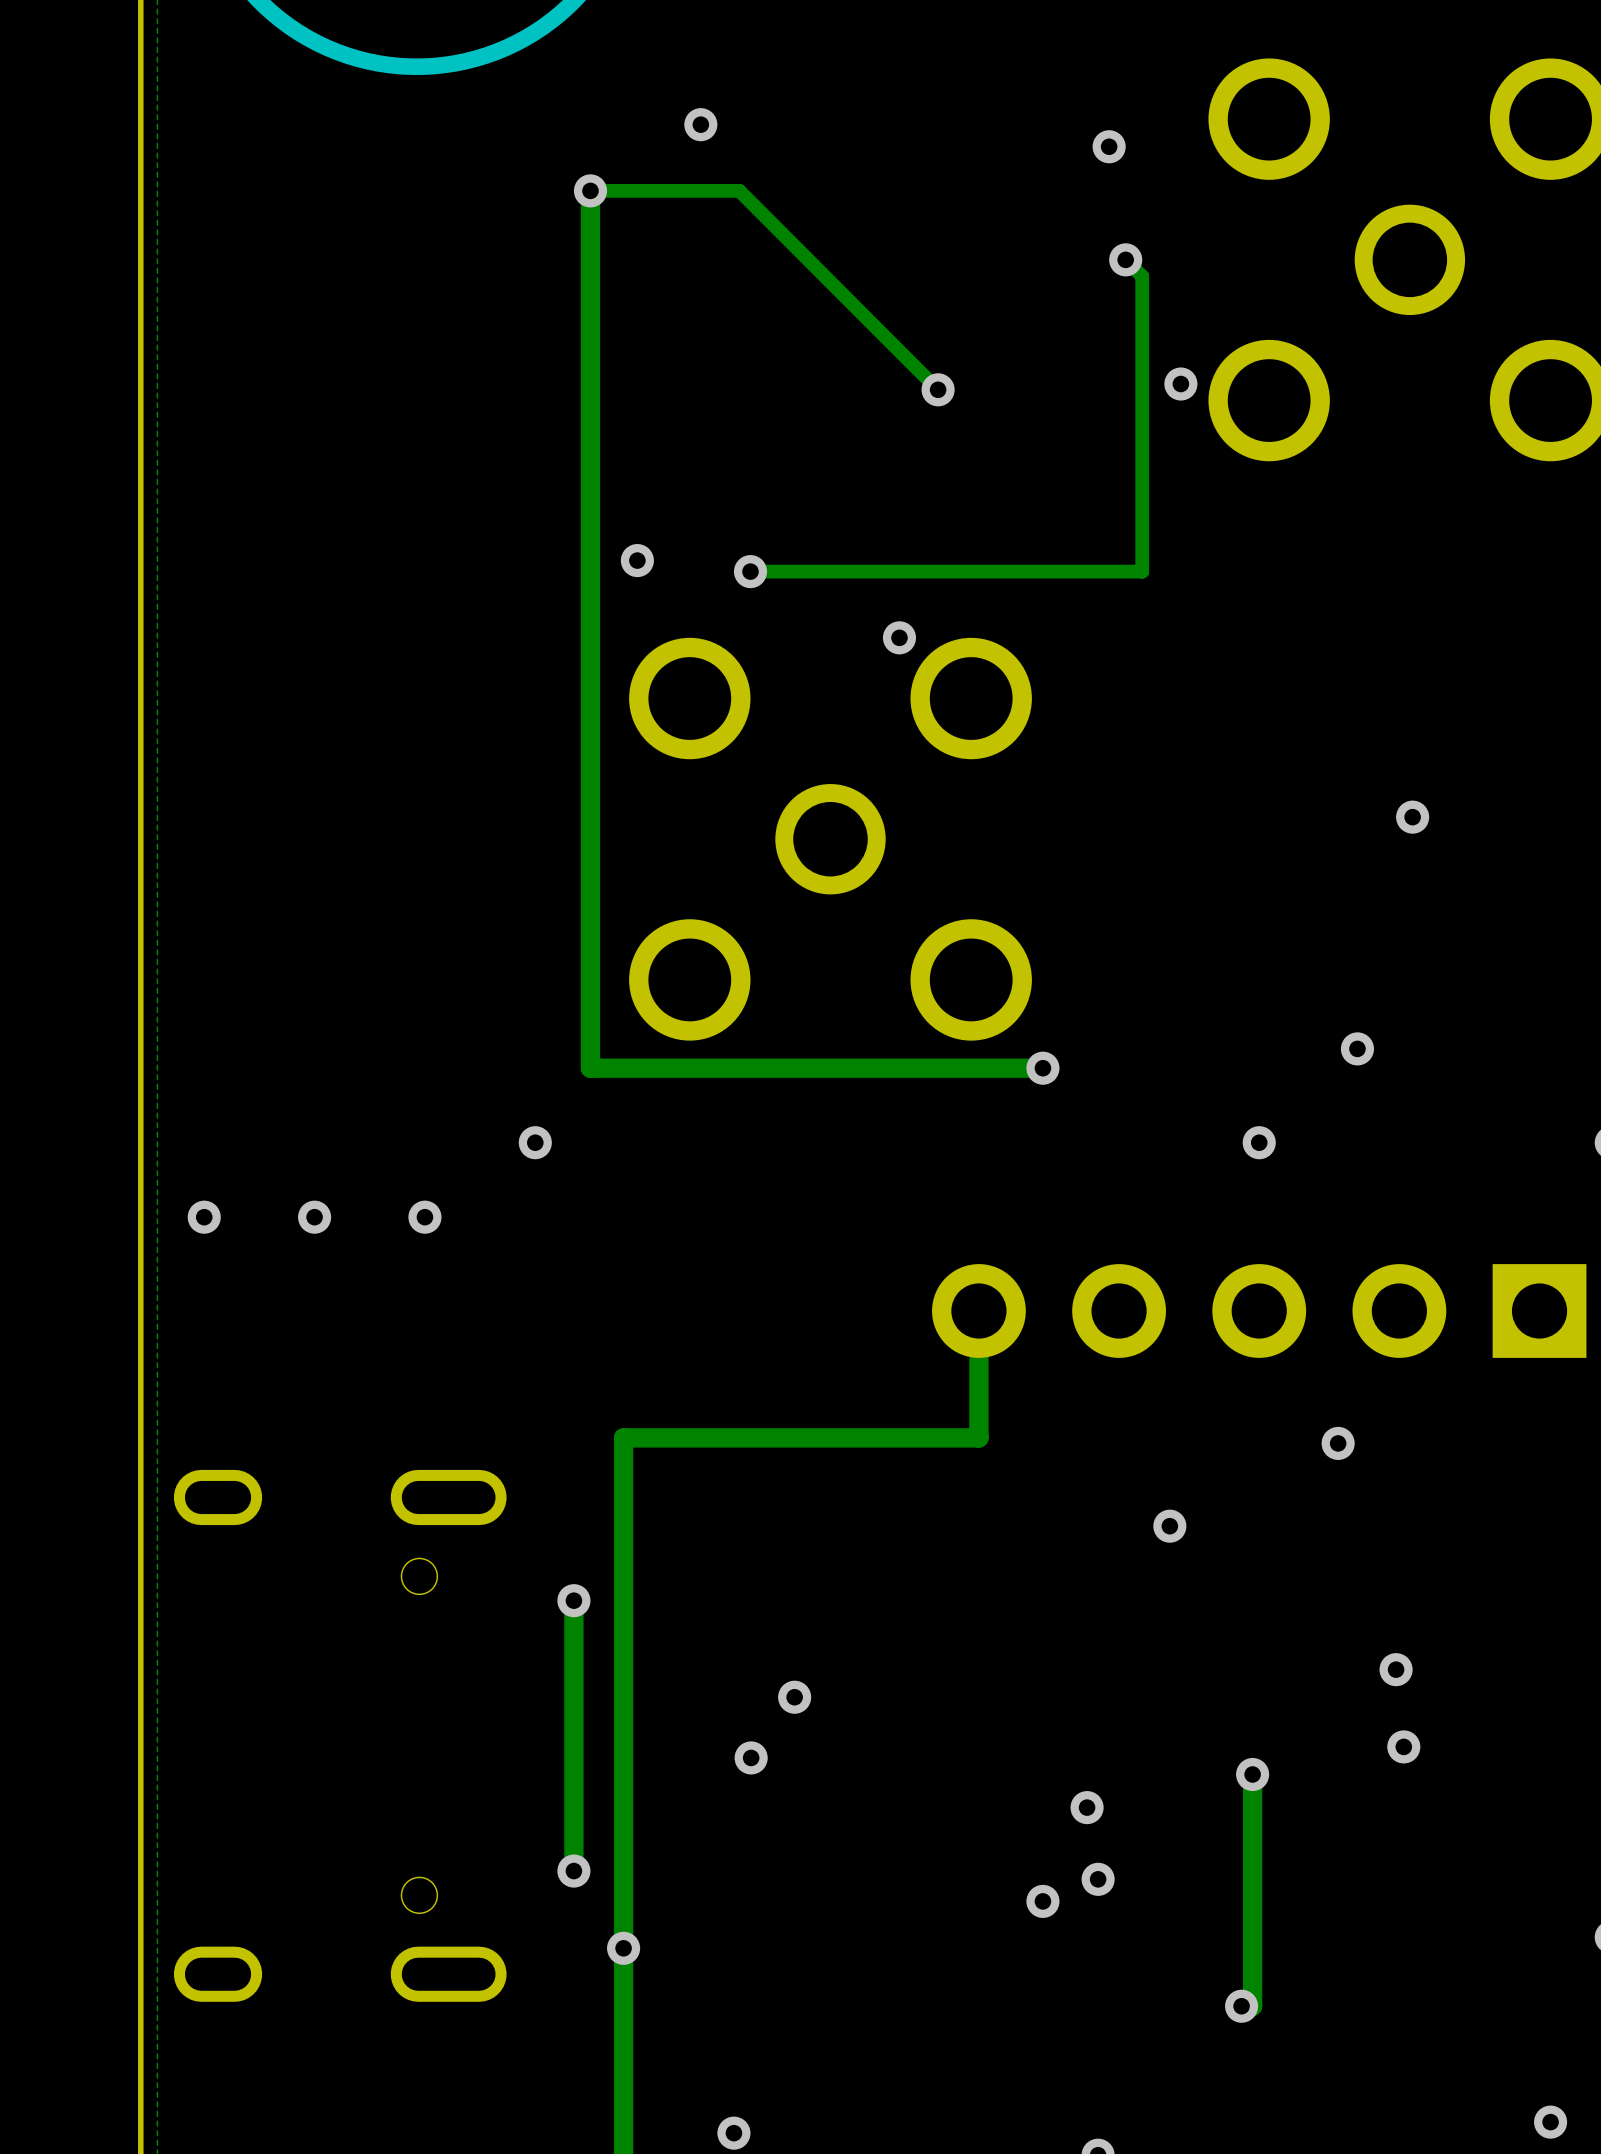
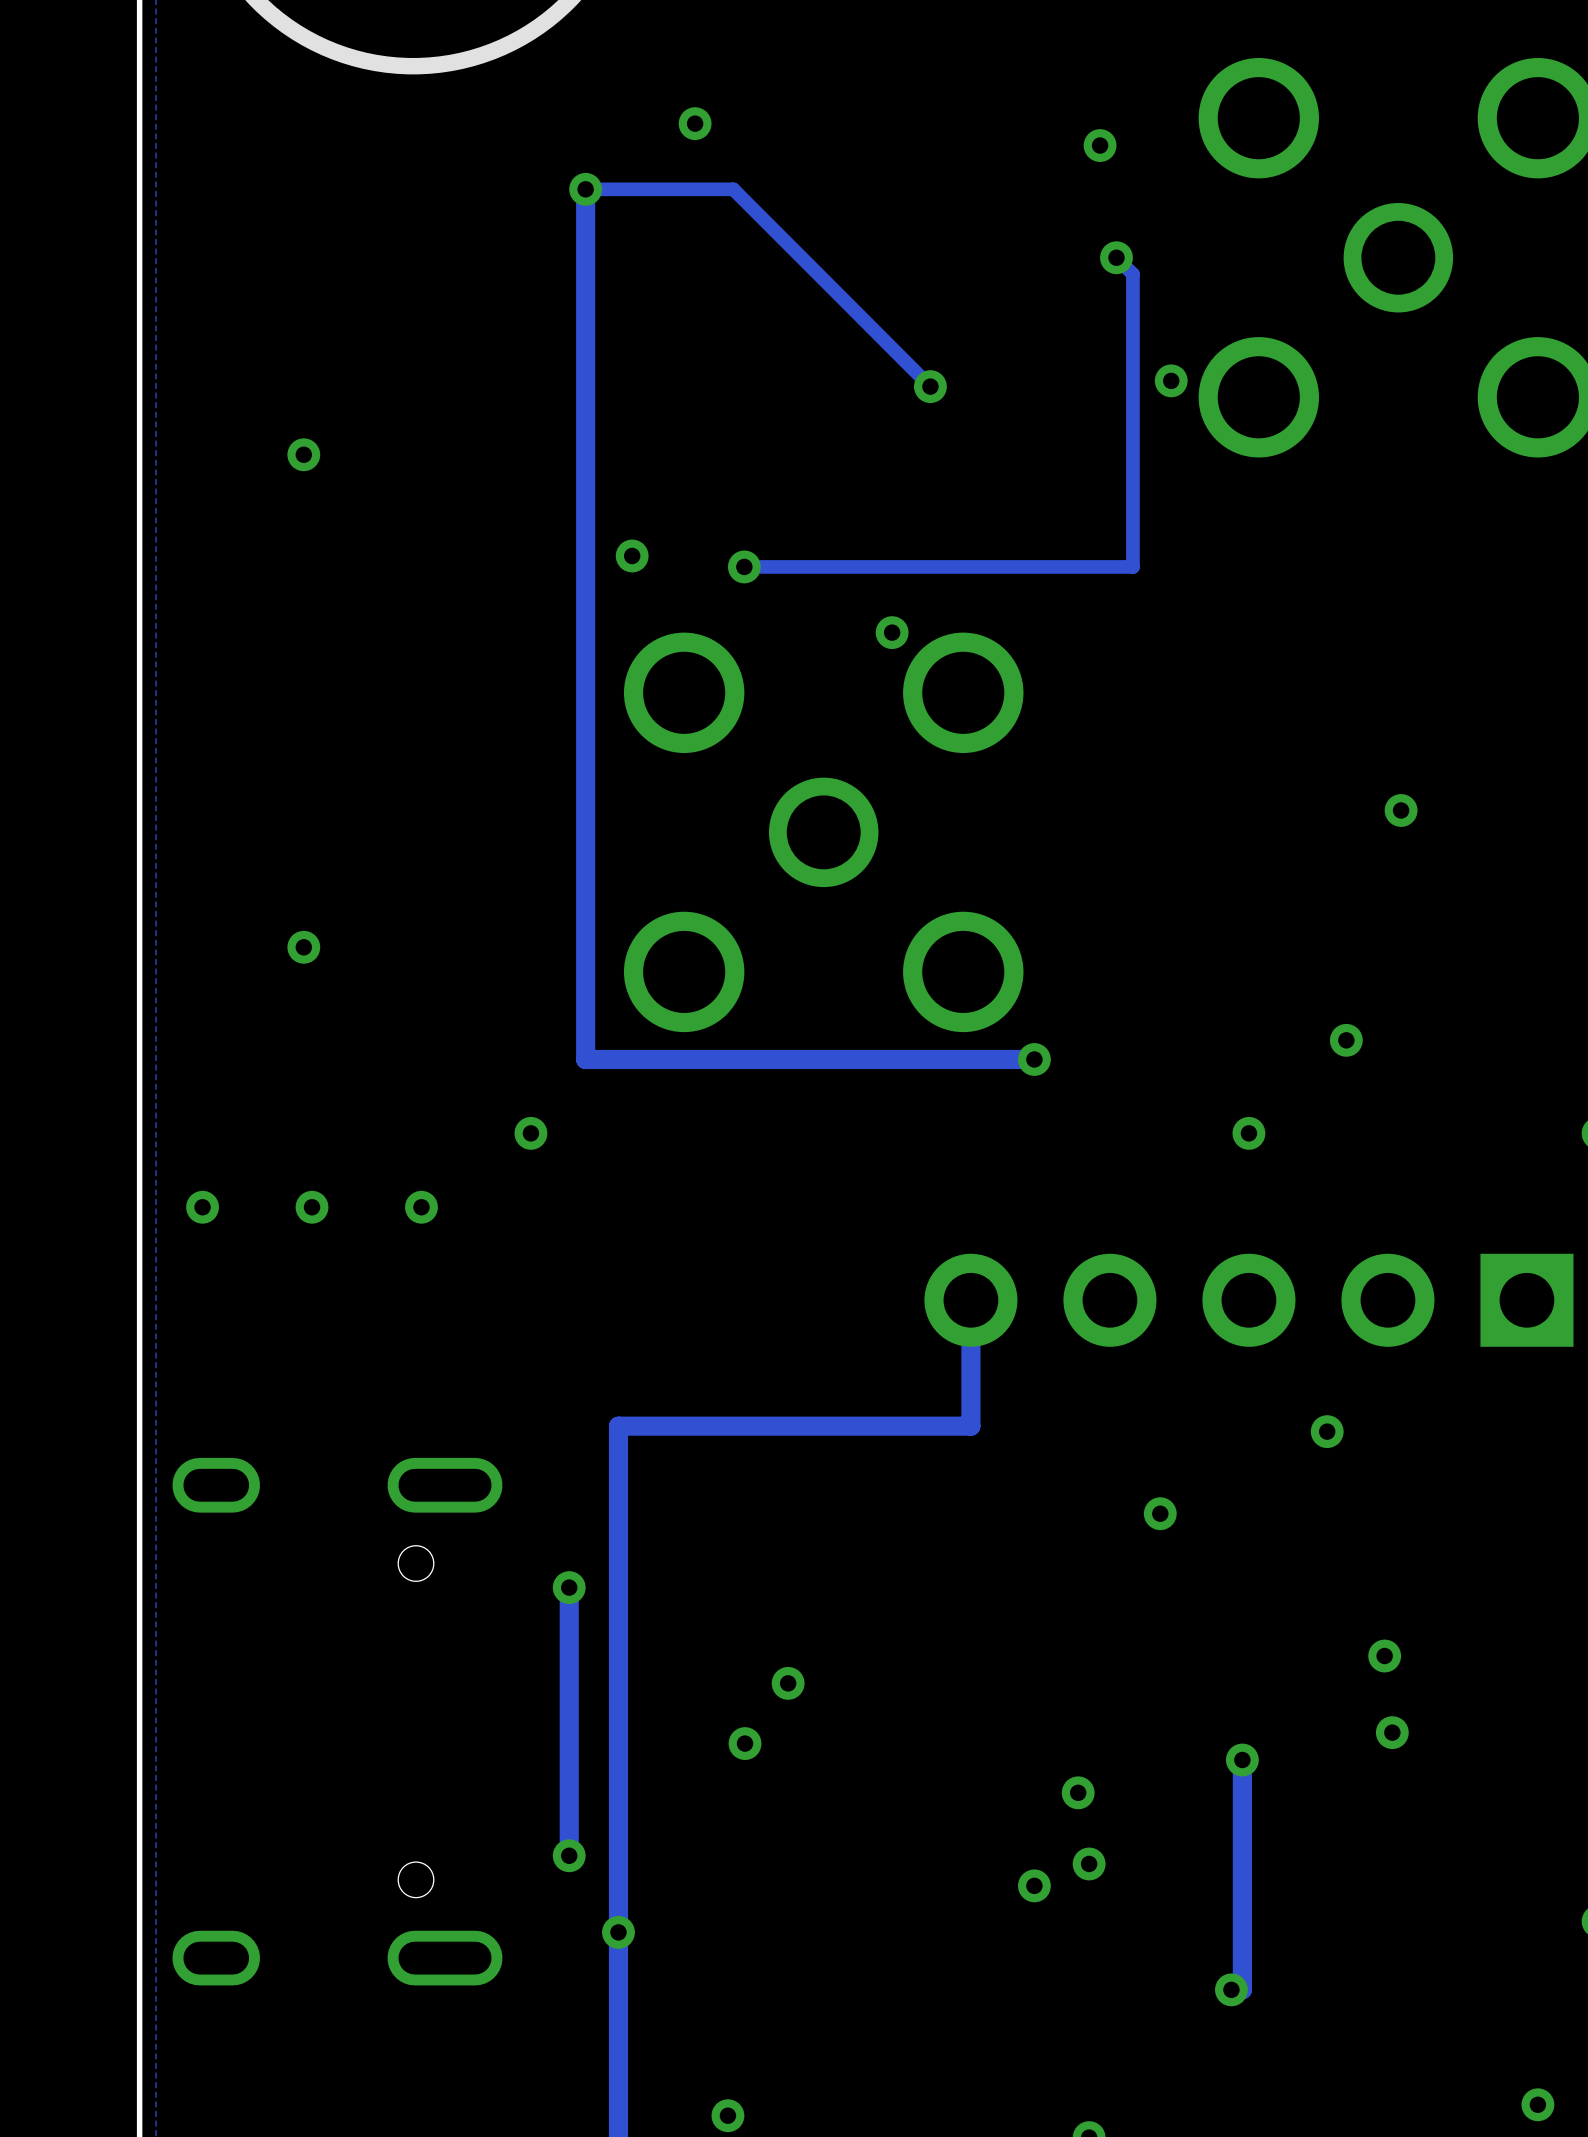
via: none -> (303, 454)
via: none -> (303, 947)

